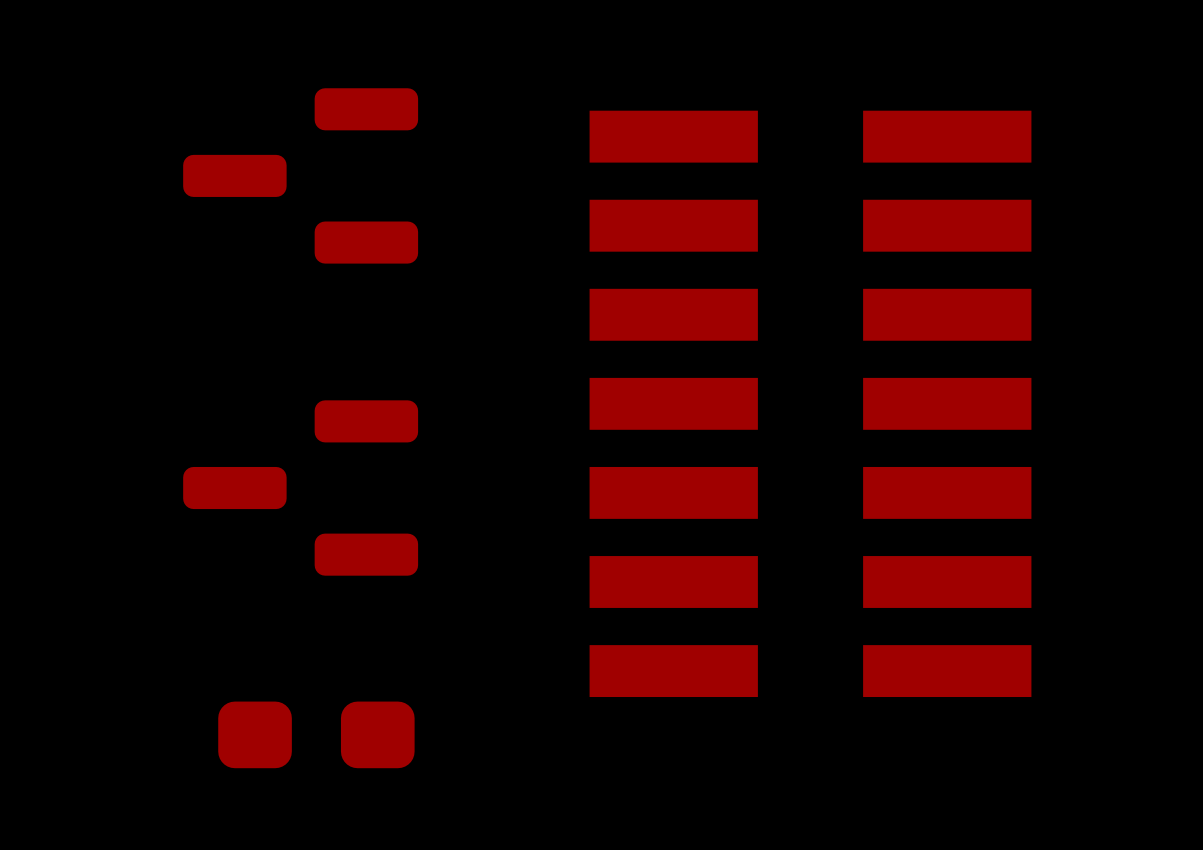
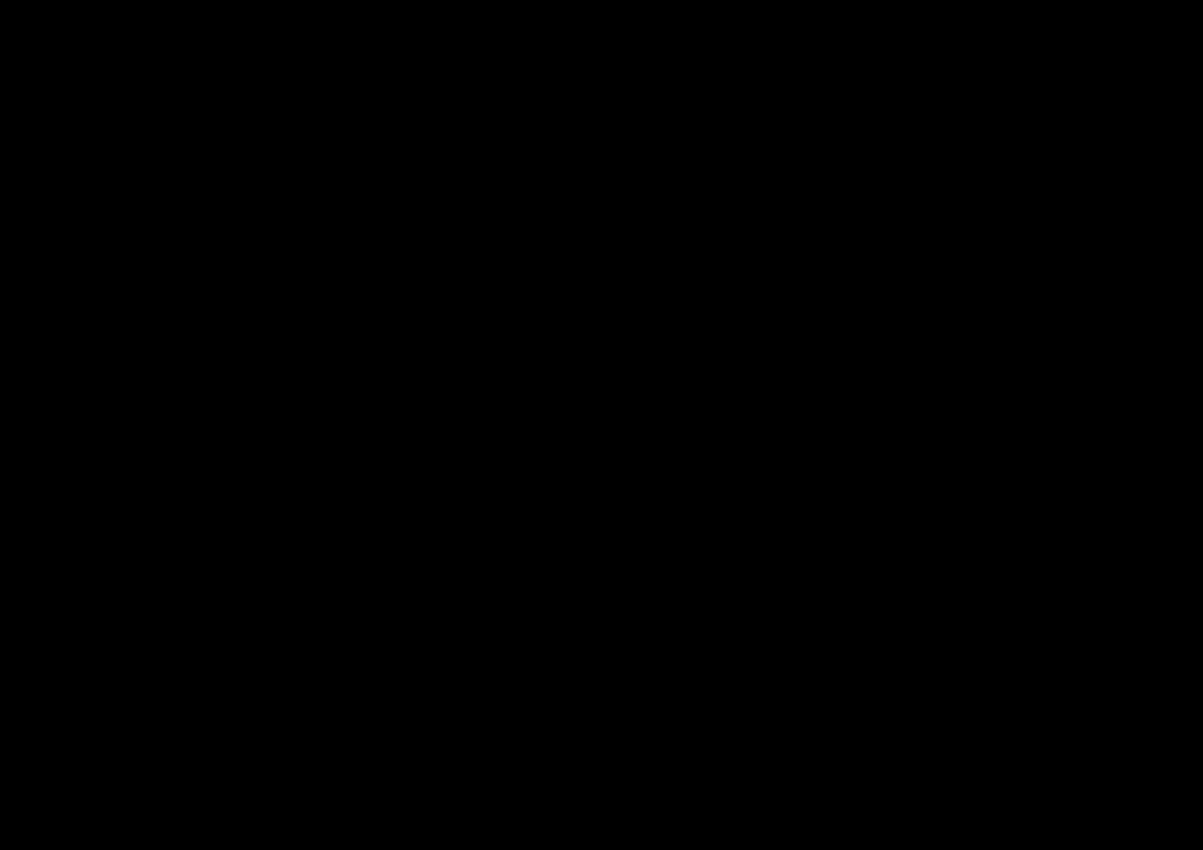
part: (300, 175) -> none
part: (810, 403) -> none
part: (300, 488) -> none
part: (316, 734) -> none

